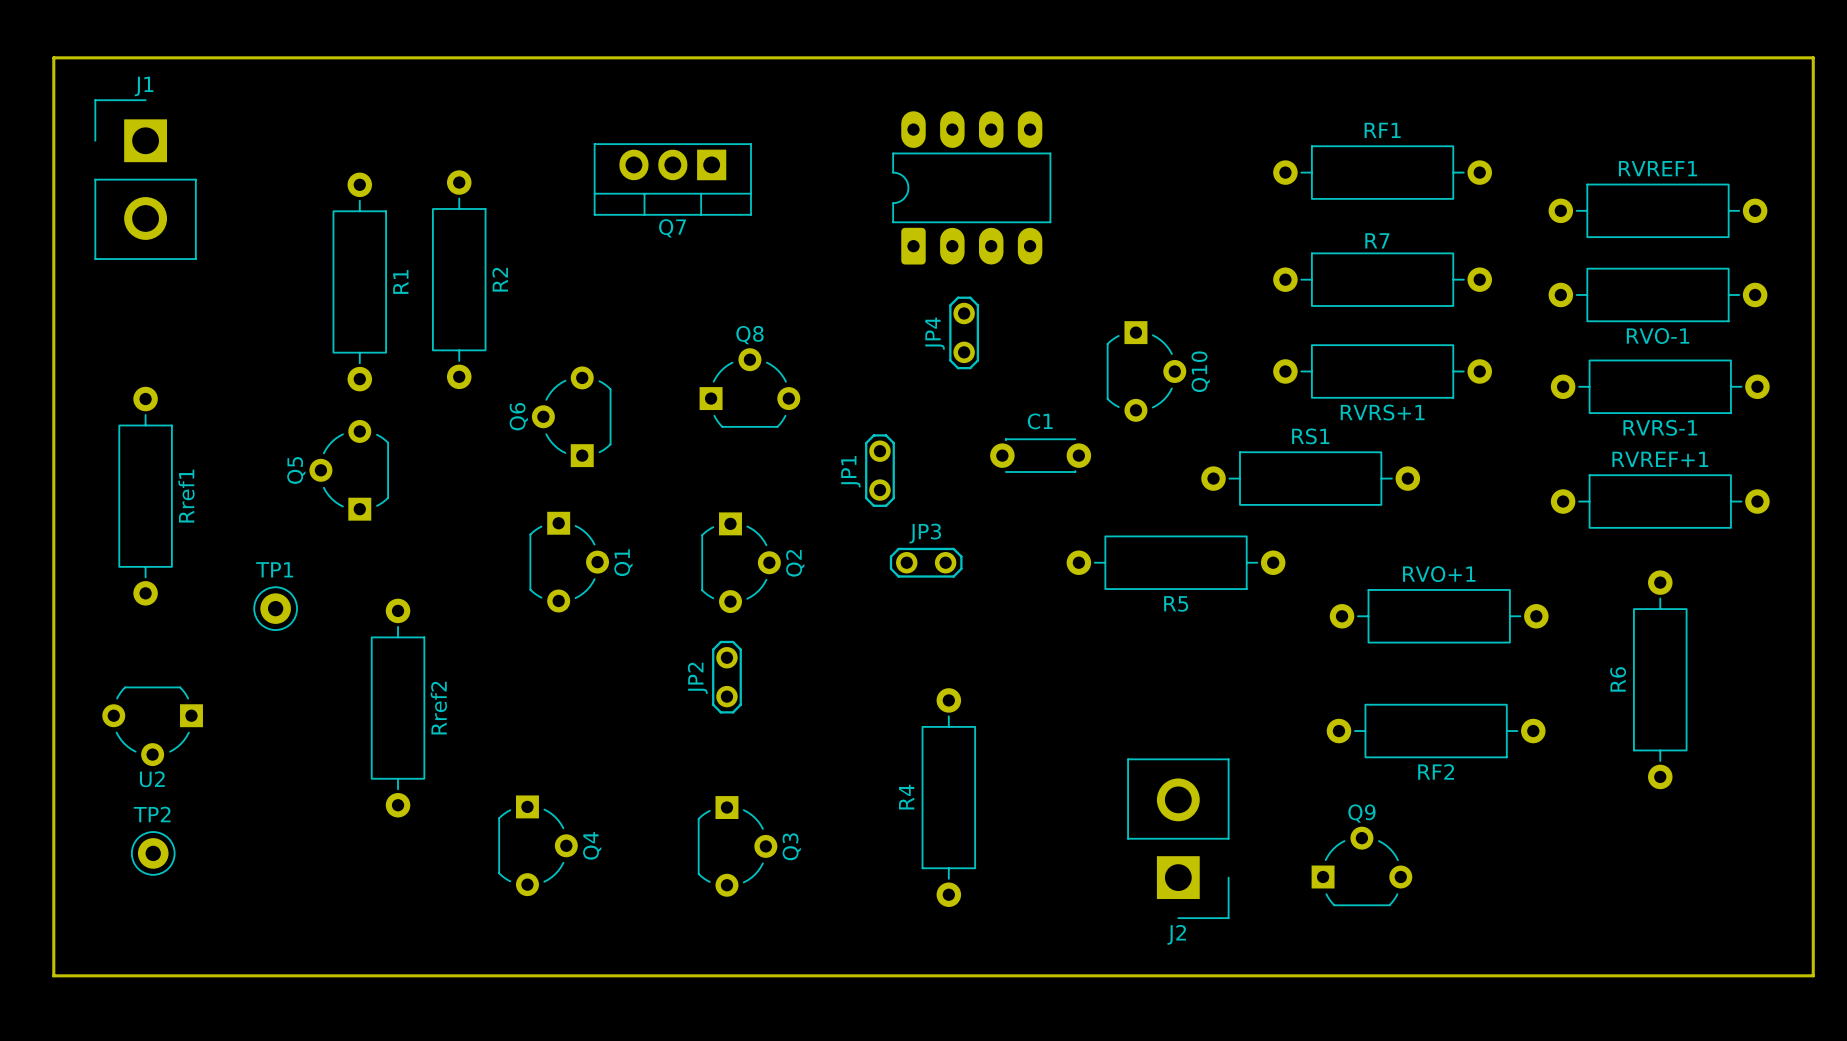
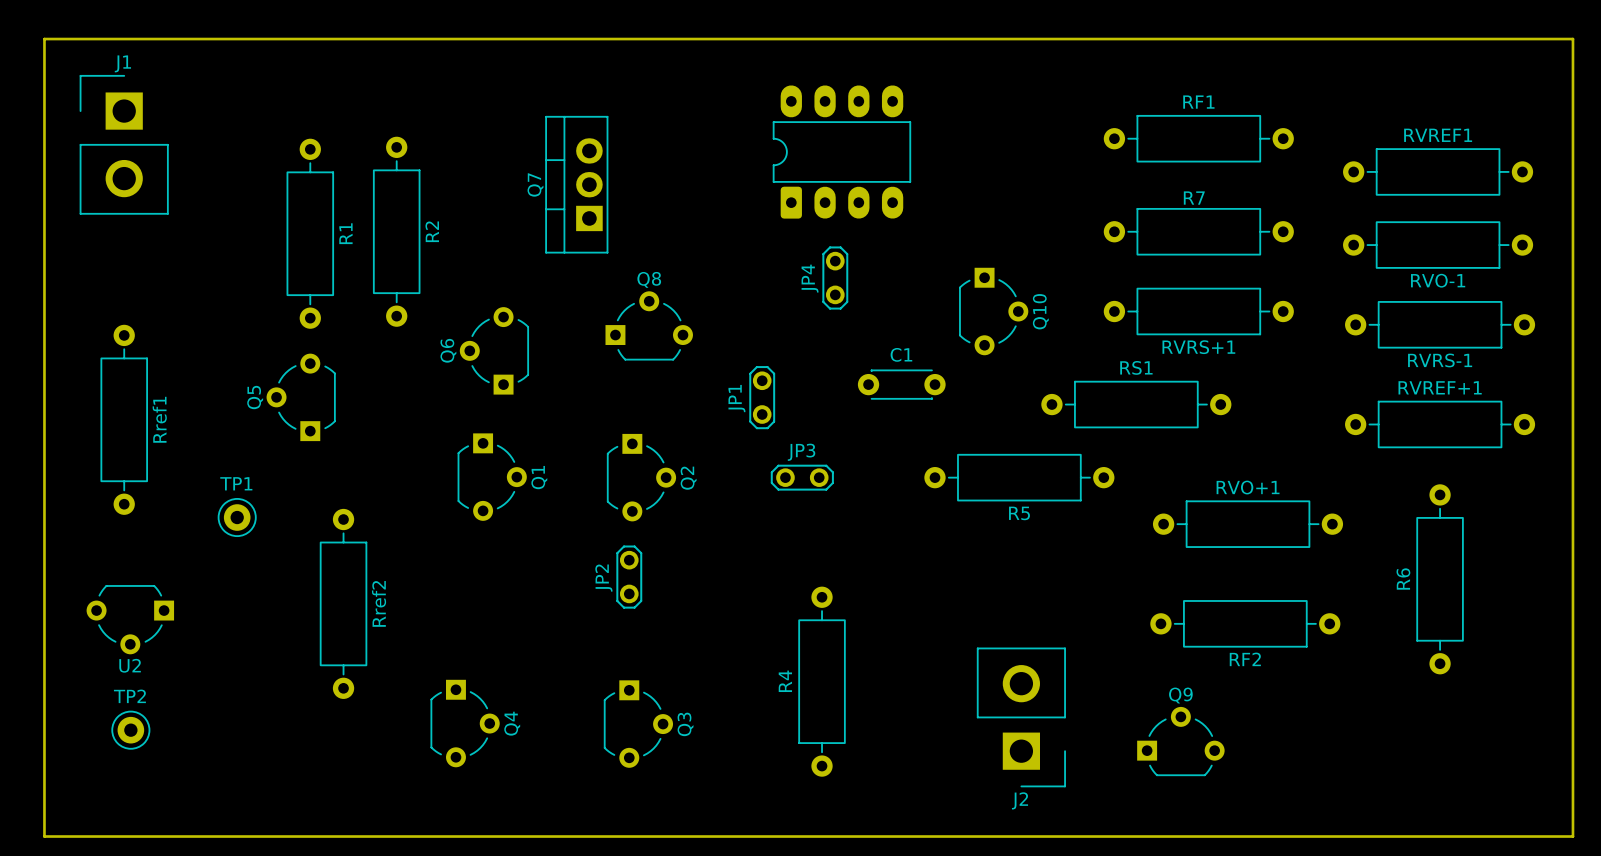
Q7 rotation: 0° (672, 179) -> 90° clockwise (576, 184)

